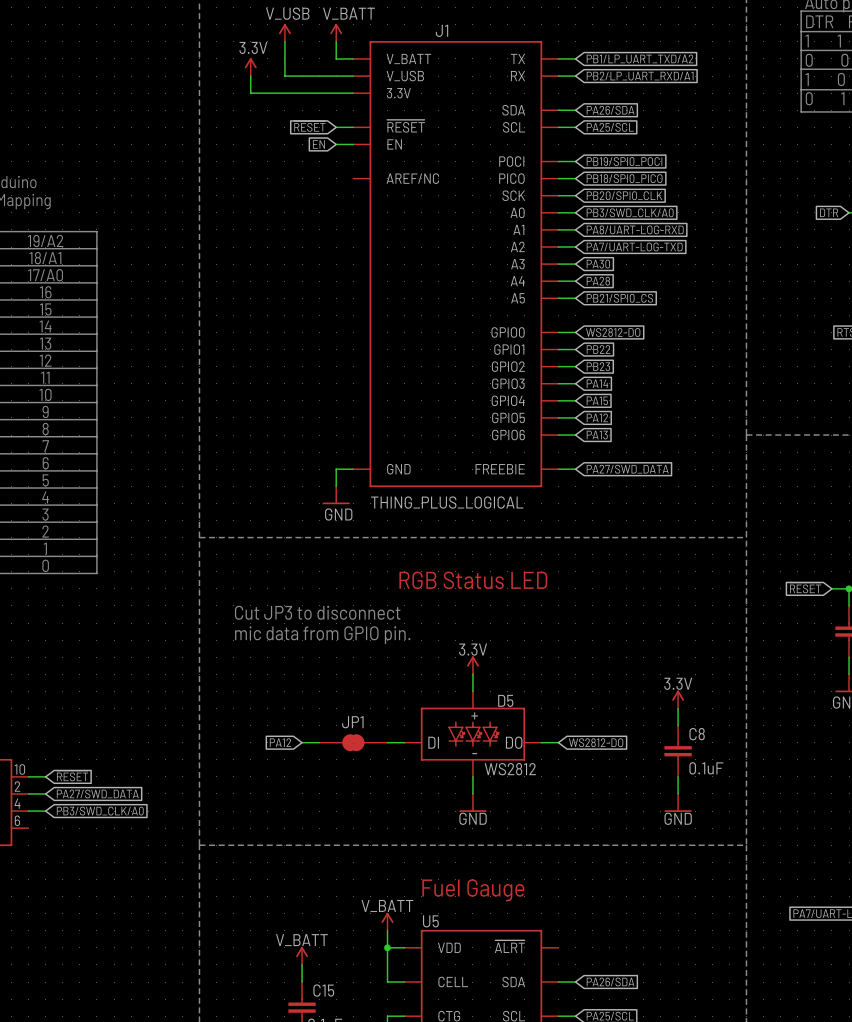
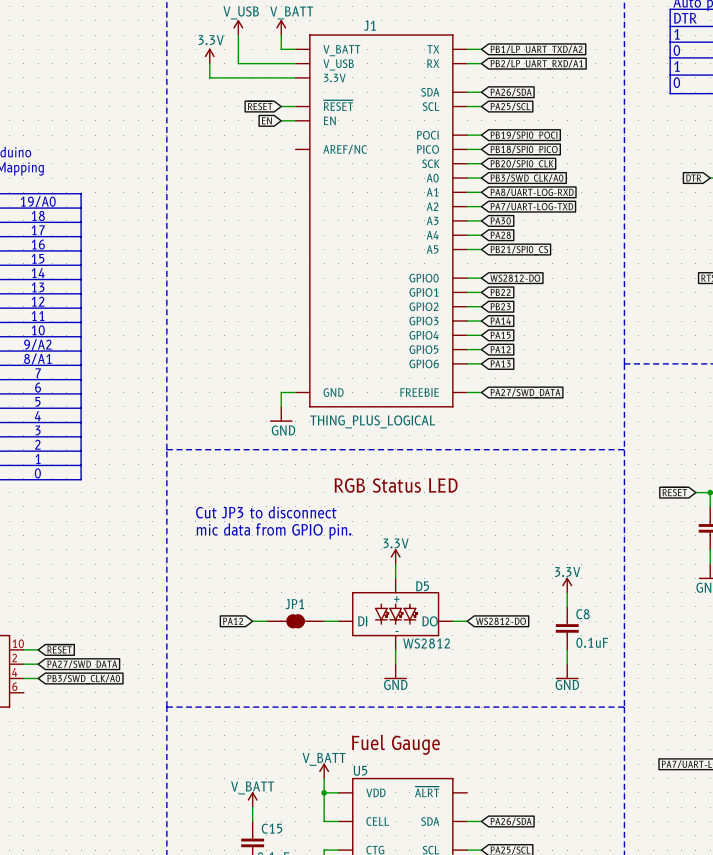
text: 19/A2 (45, 241) -> 19/A0 (38, 201)
text: 18/A1 (45, 258) -> 18 (38, 215)
text: 17/A0 (45, 275) -> 17 (38, 230)
text: 9 (45, 411) -> 9/A2 (37, 344)
text: 8 (45, 429) -> 8/A1 (37, 358)

